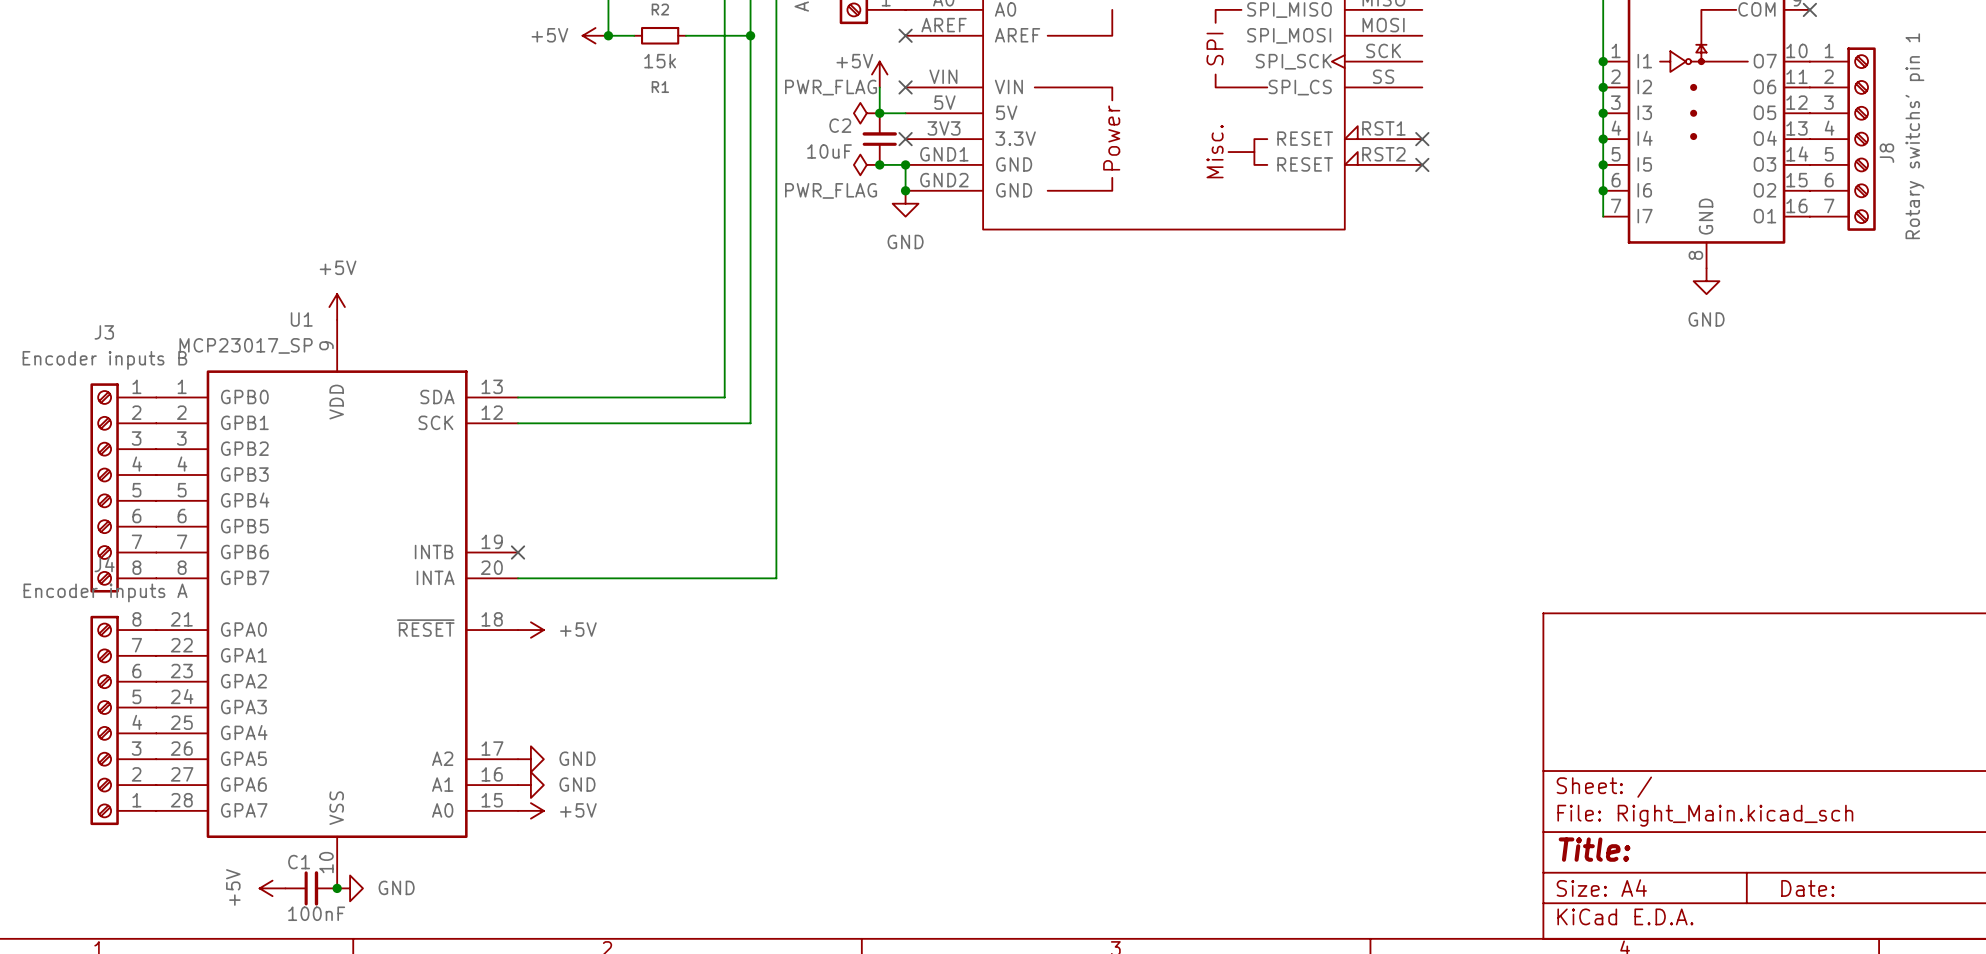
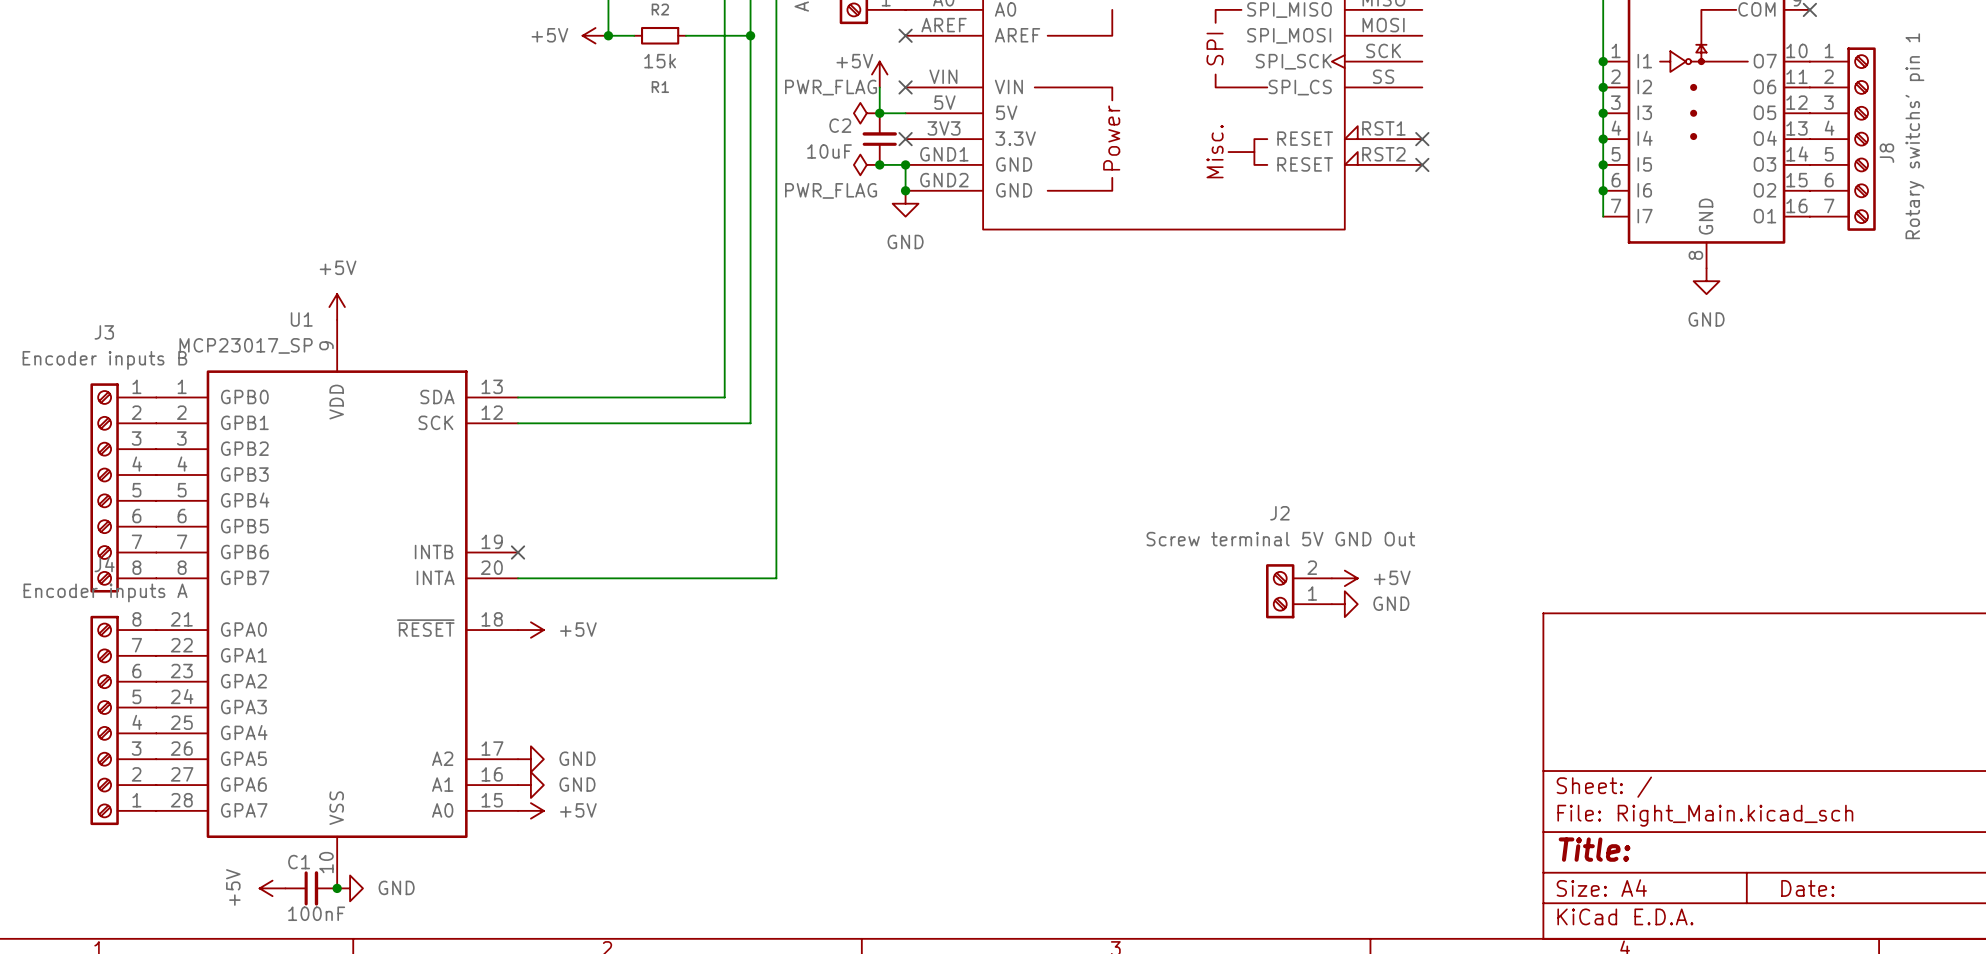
power symbol: none -> +5V (1344, 578)
J2: none -> Screw terminal 5V GND Out (1298, 591)
power symbol: none -> GND (1344, 604)

